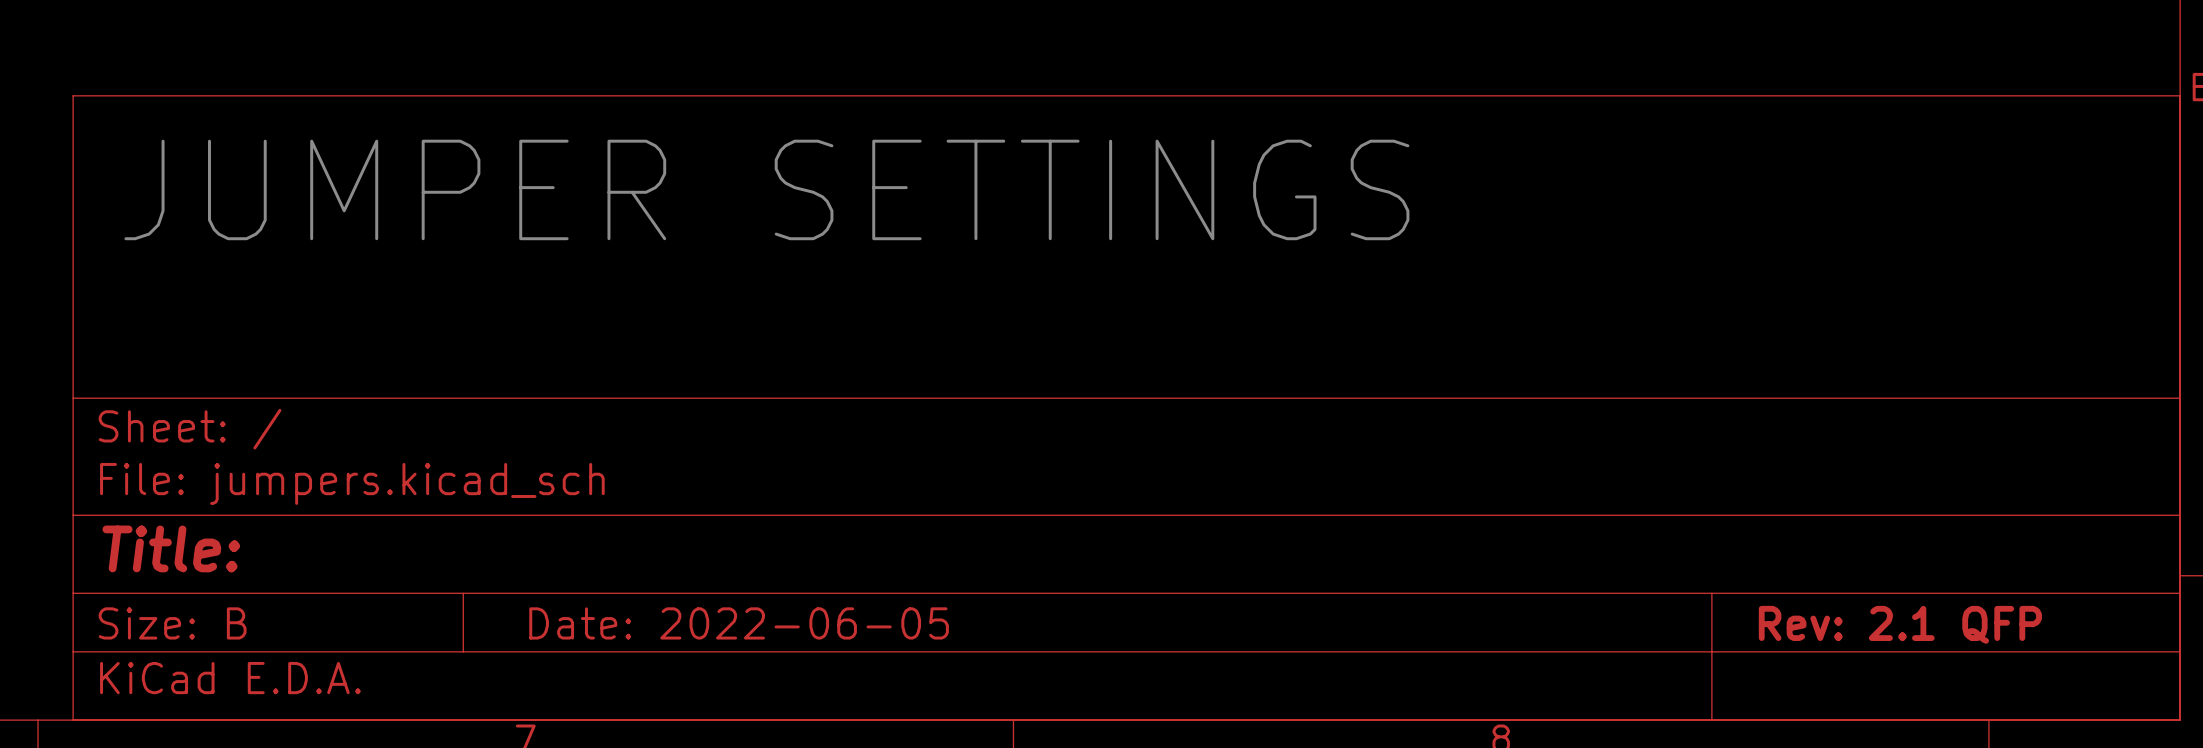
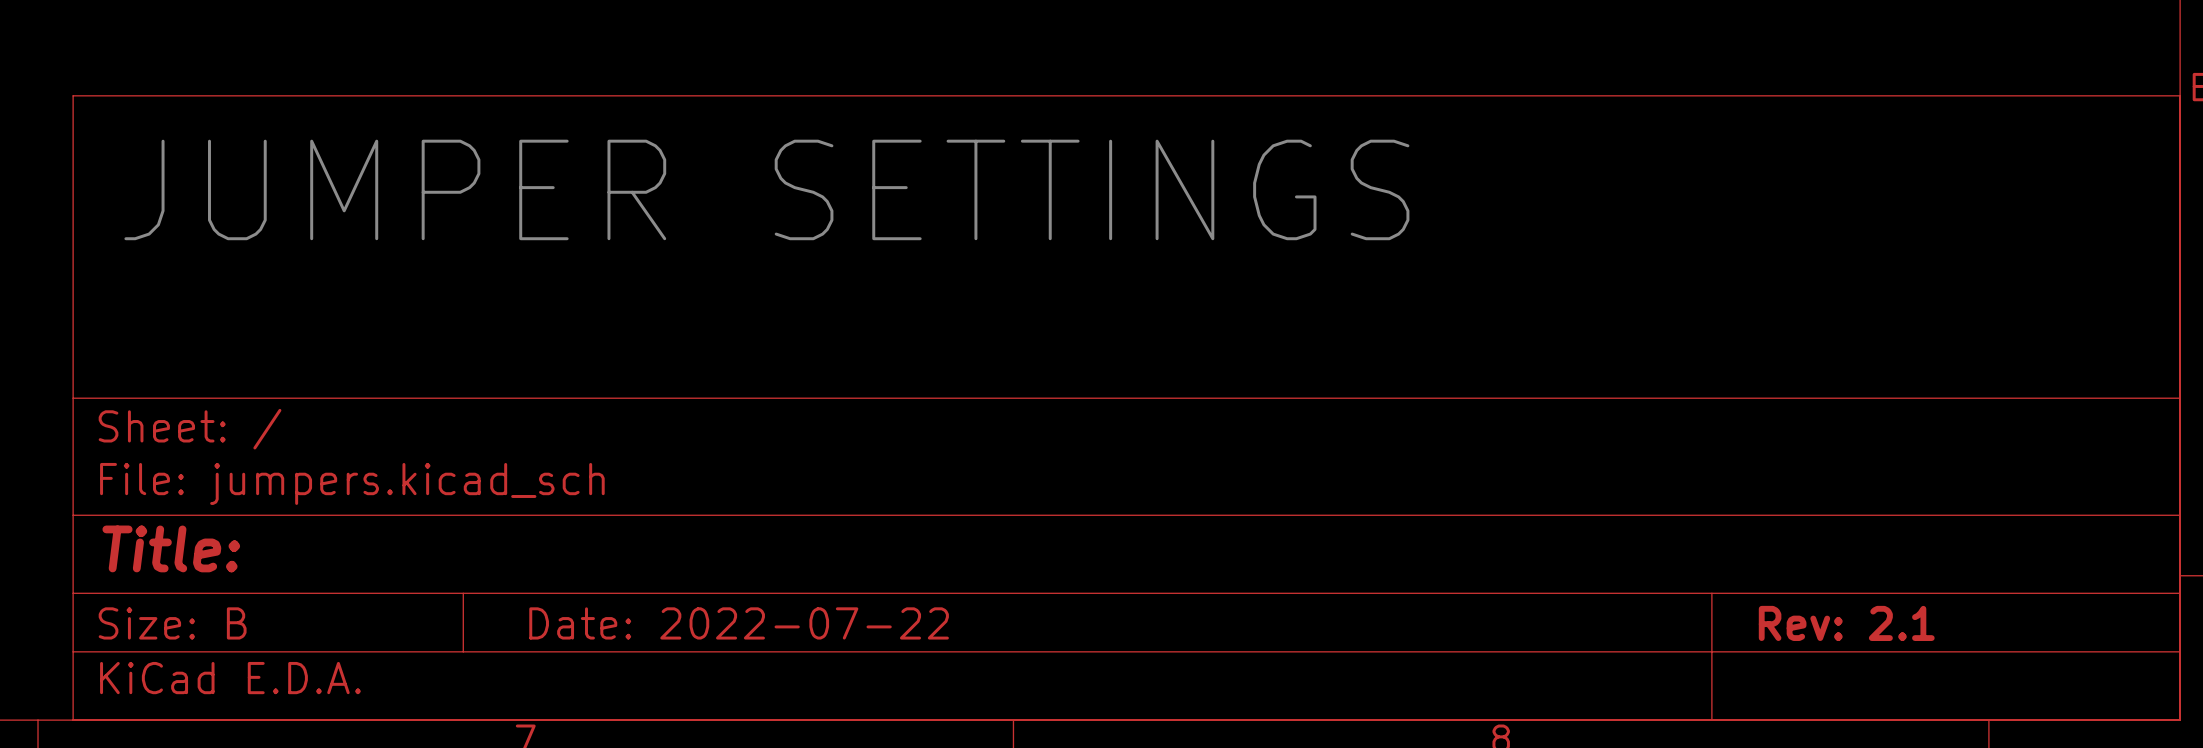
title block: Date: 2022-06-05 (739, 623) -> Date: 2022-07-22 (739, 623)
title block: Rev: 2.1 QFP (1900, 624) -> Rev: 2.1 (1846, 623)

